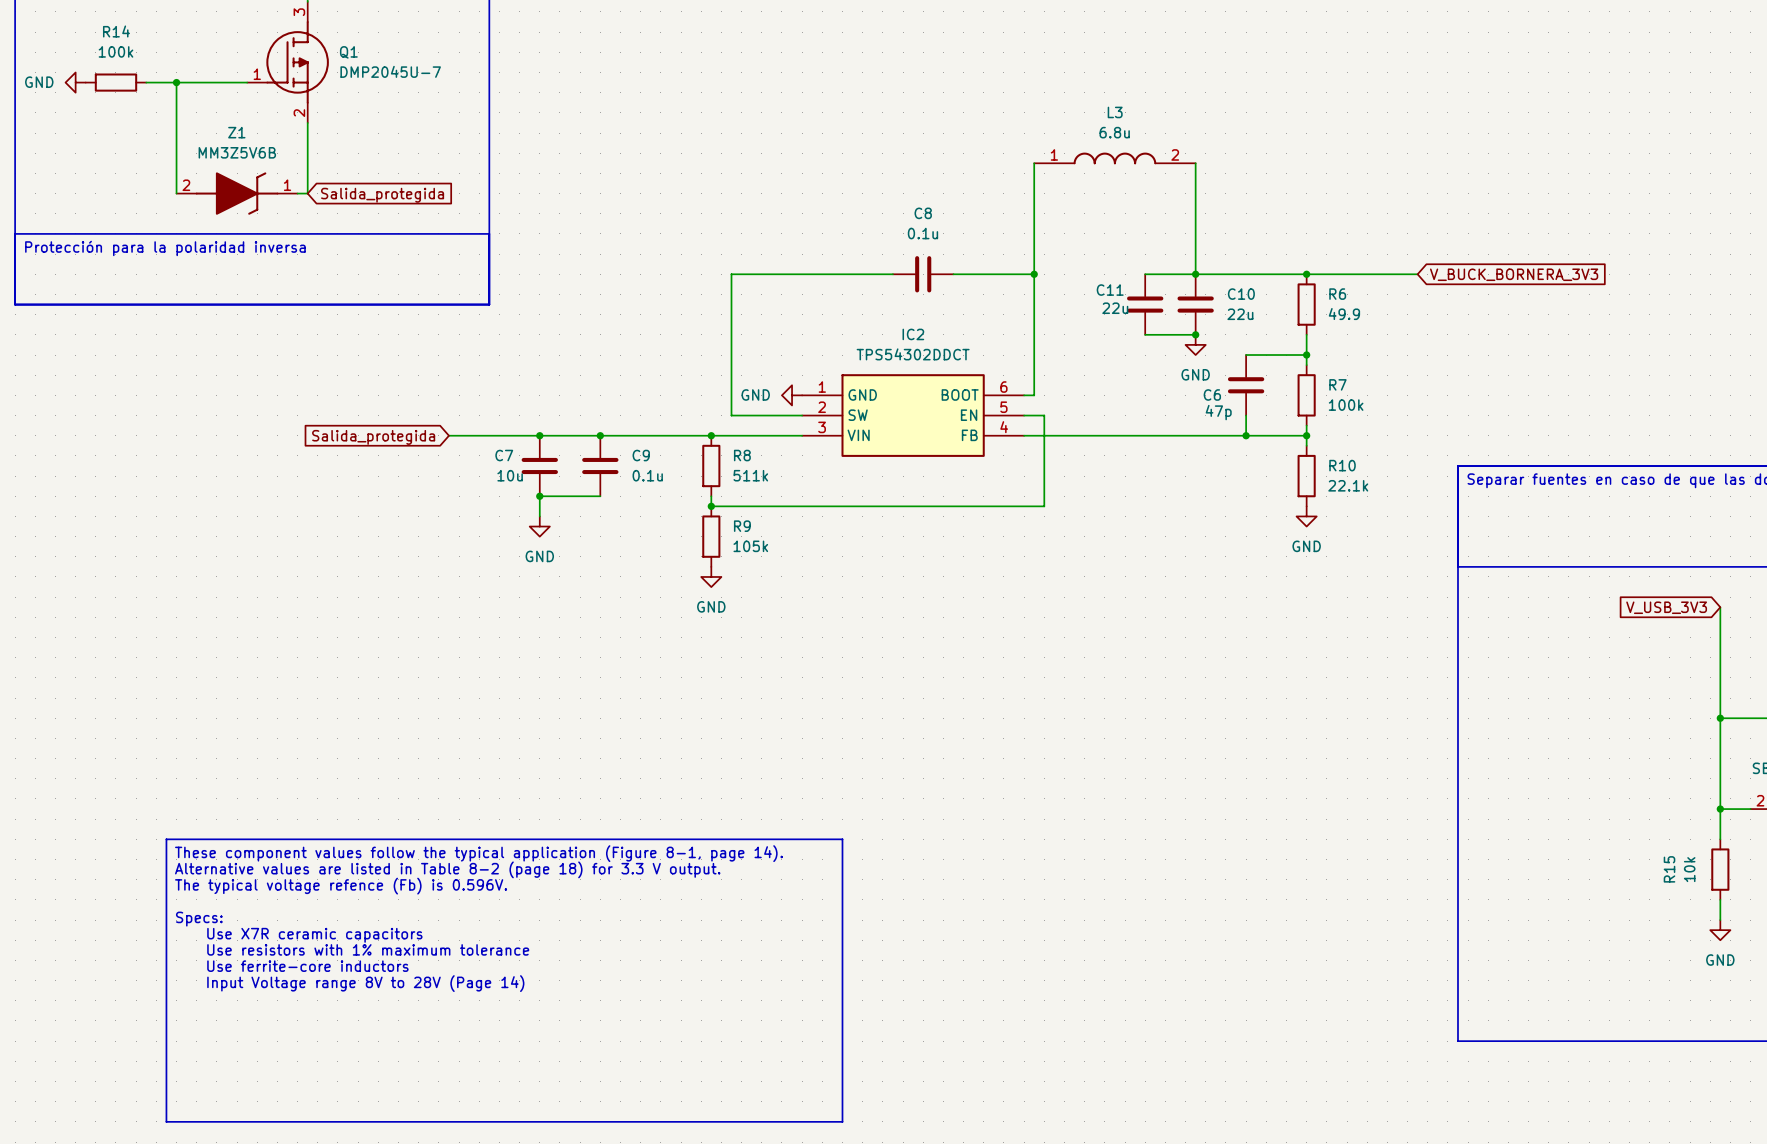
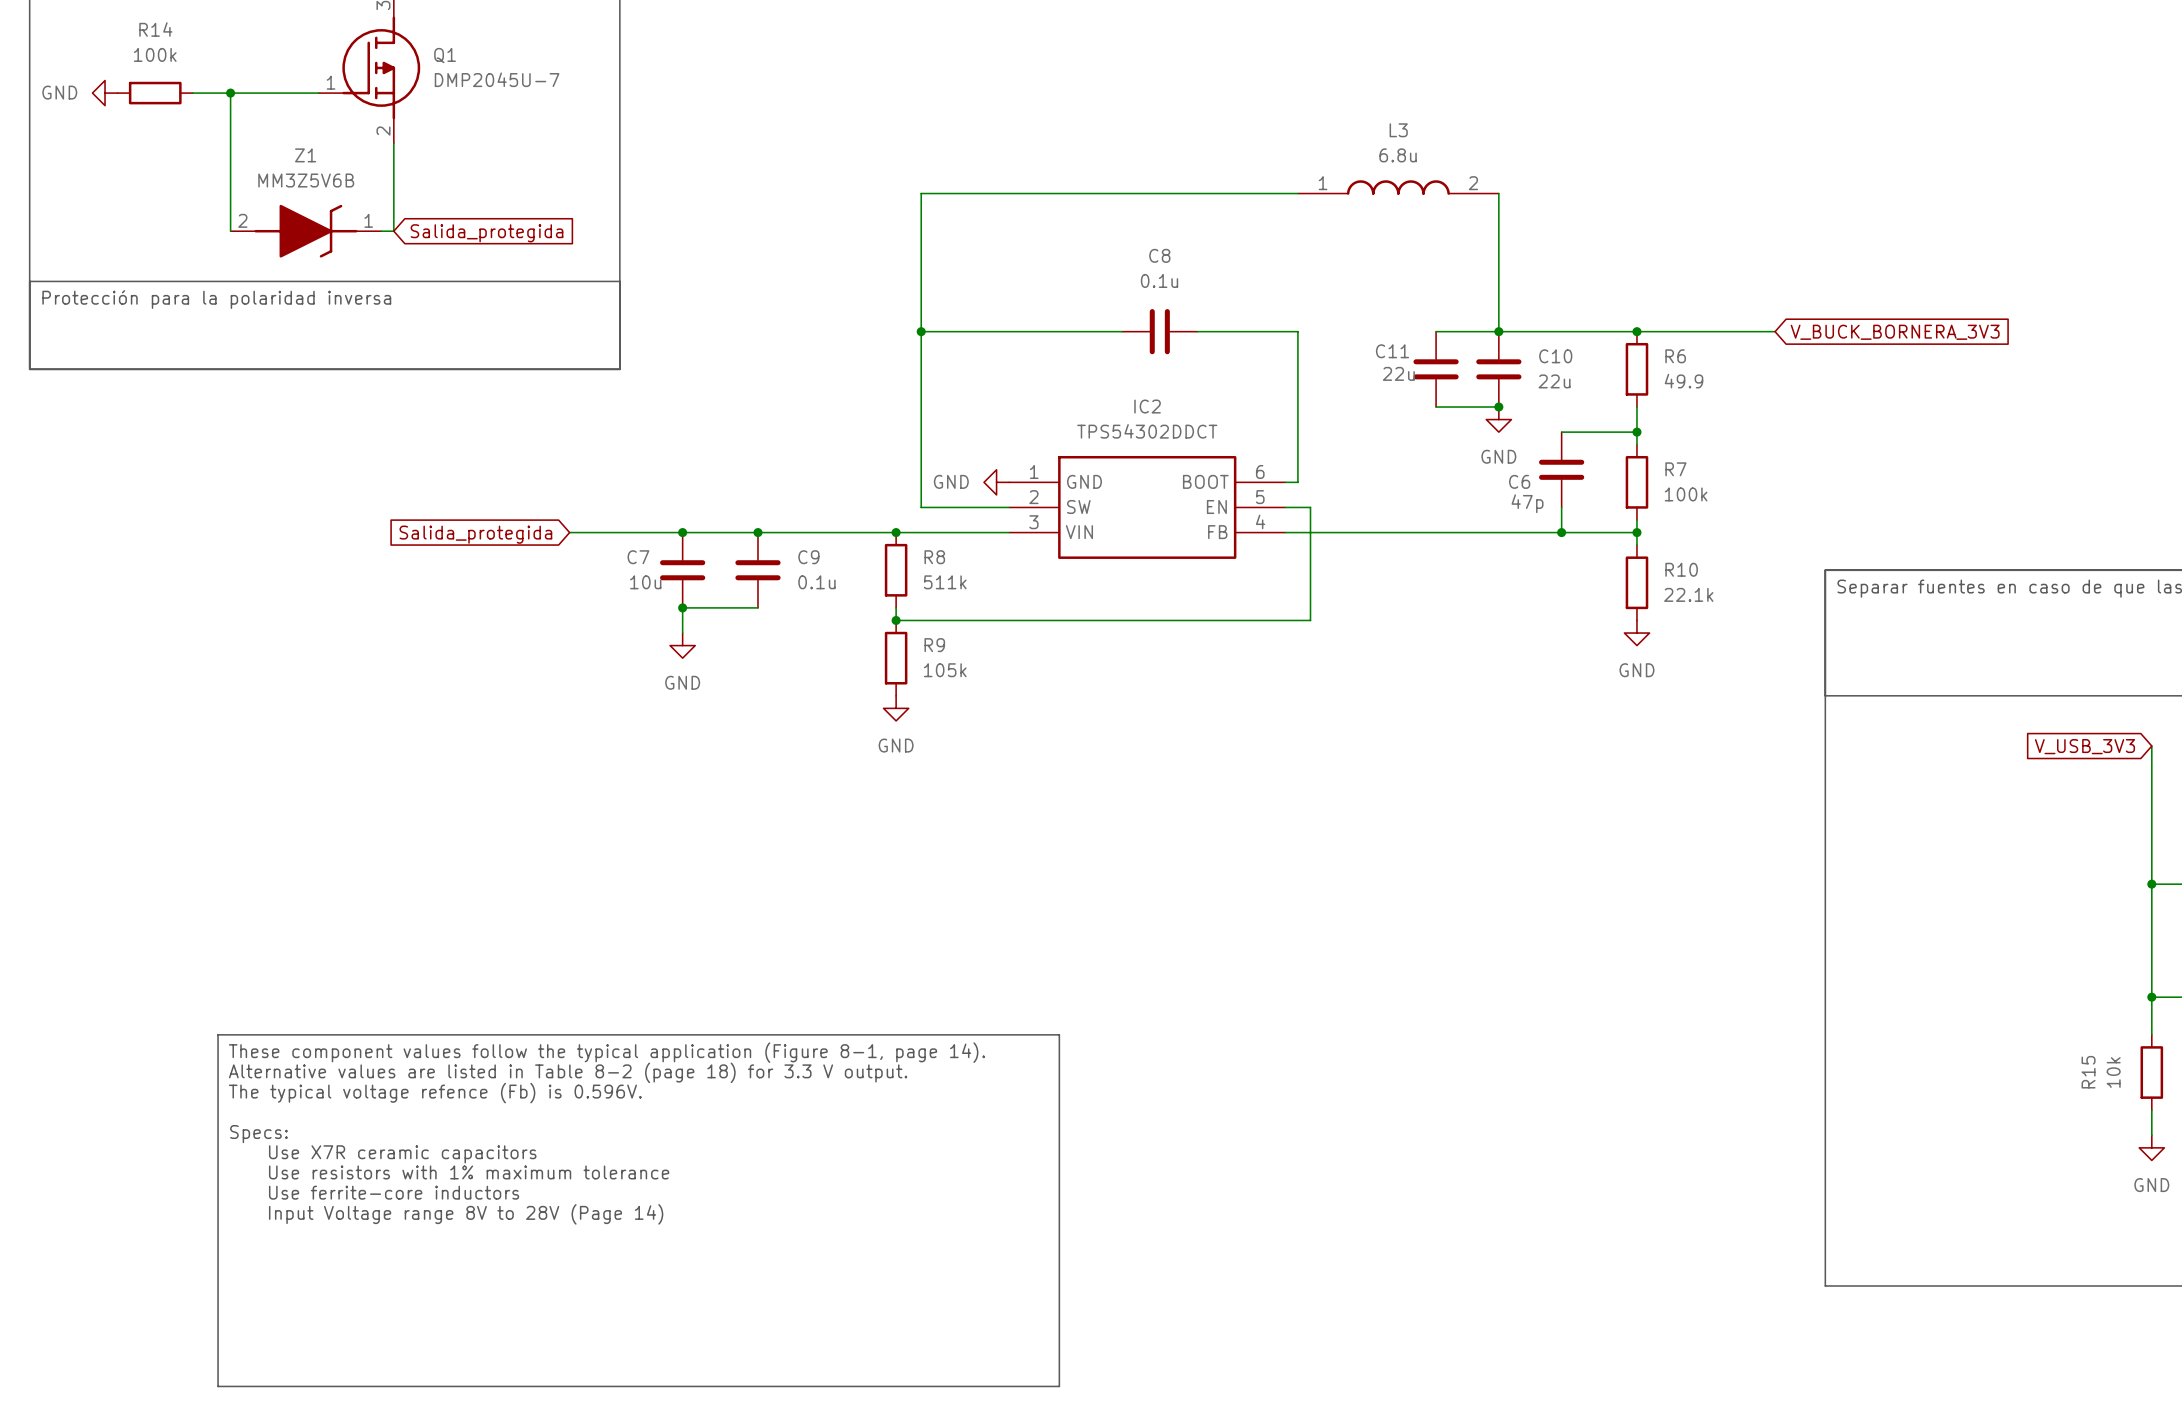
wire: (1034, 163) (1034, 274) -> (1297, 193) (921, 193) (921, 331)
junction: none -> (921, 331)
junction: (1034, 274) -> none

